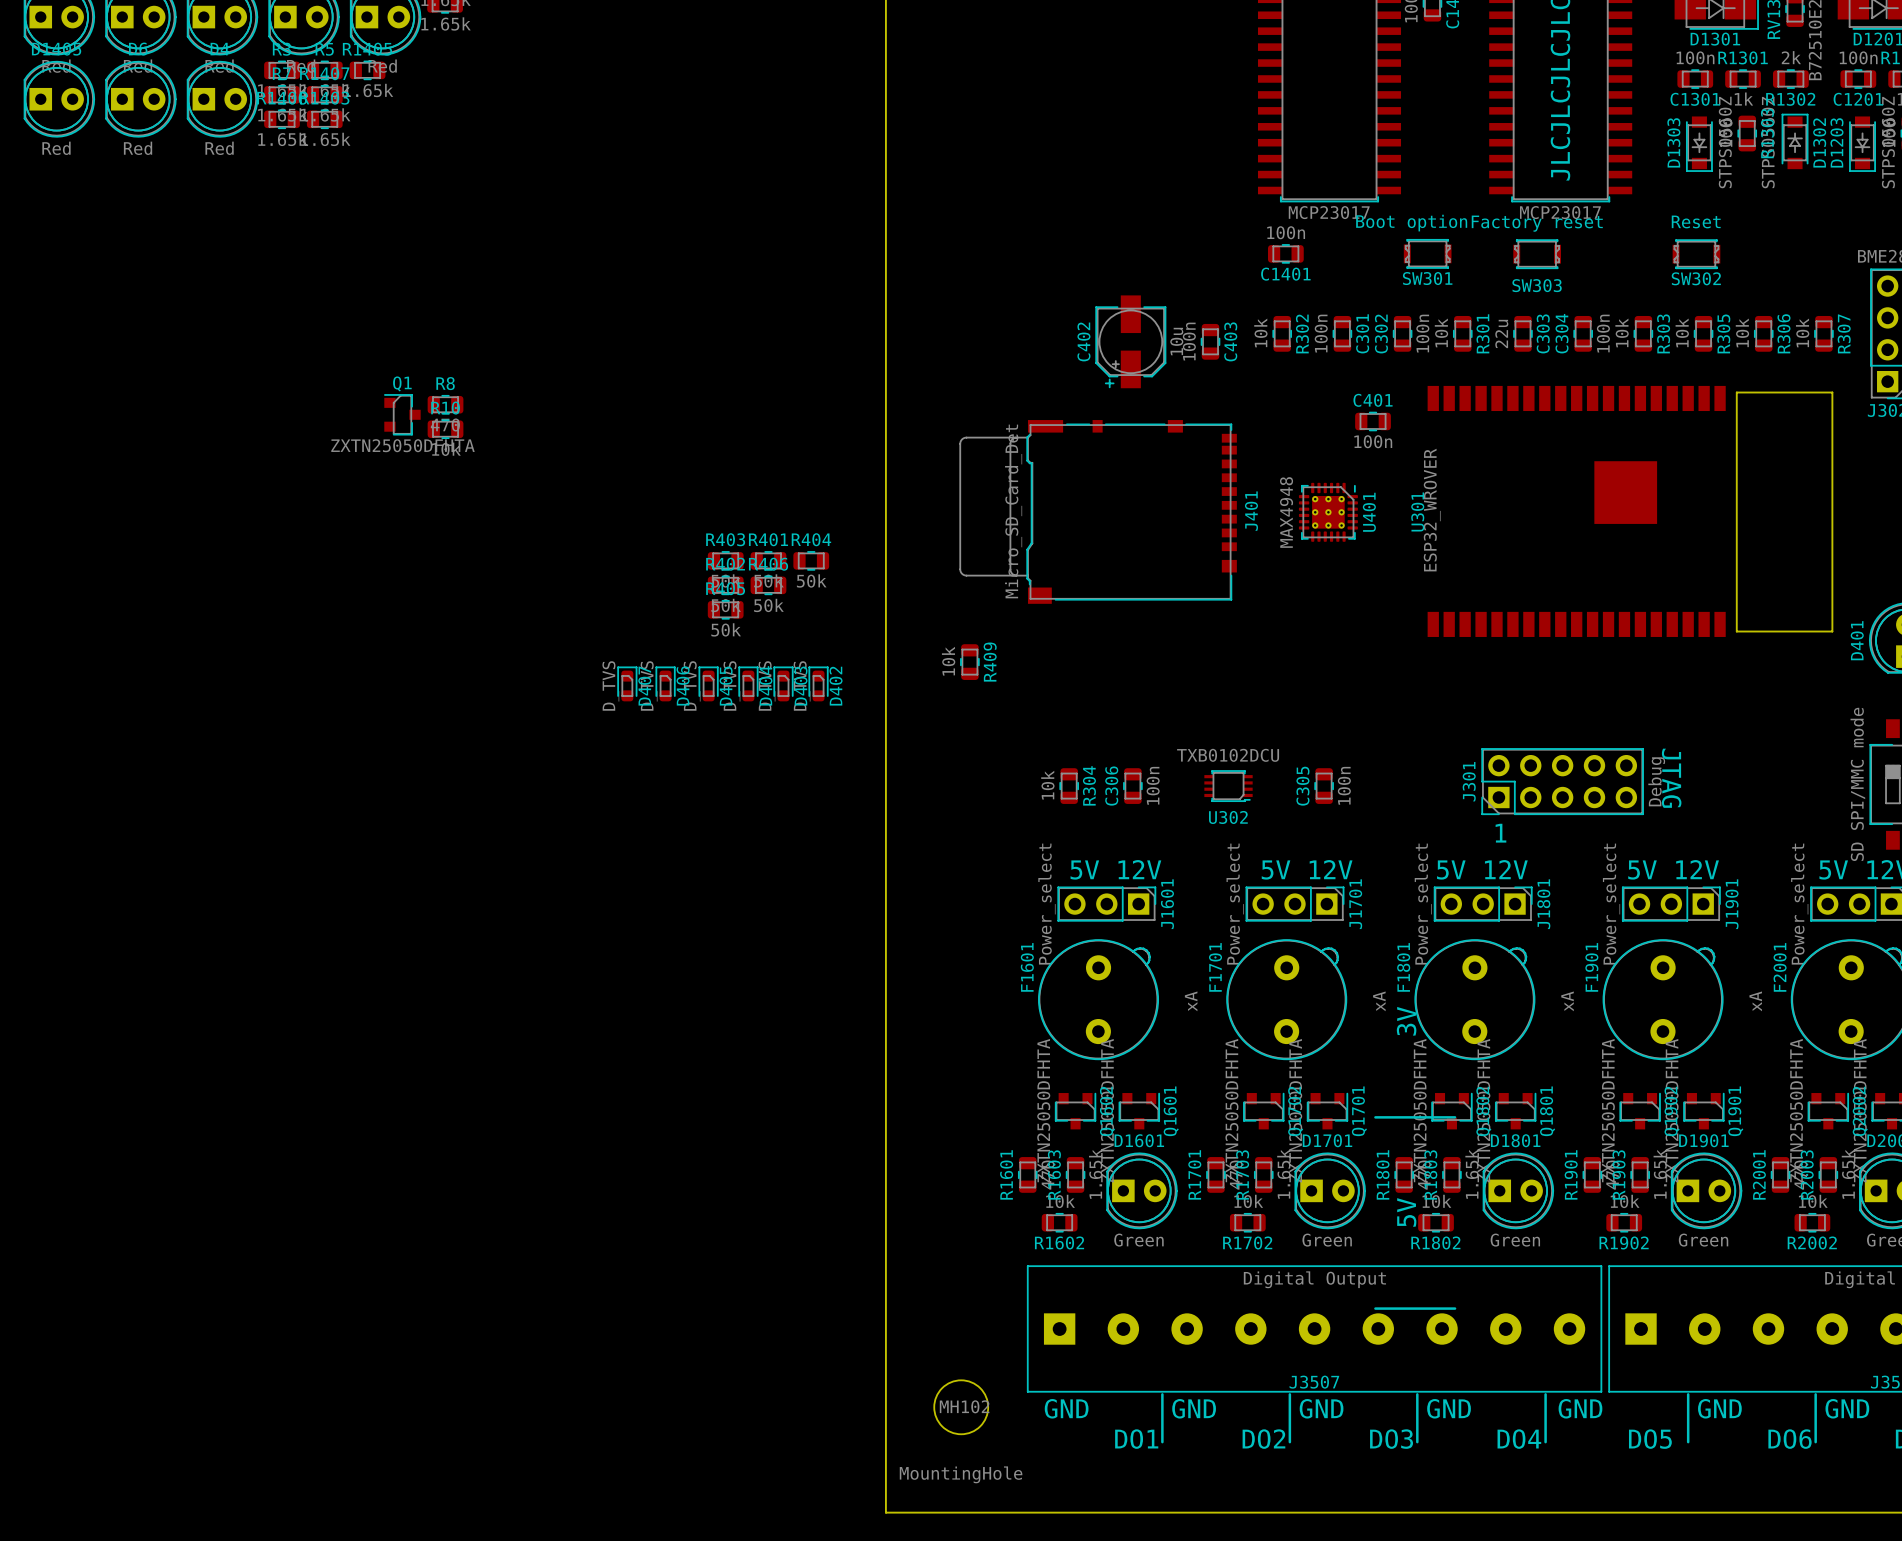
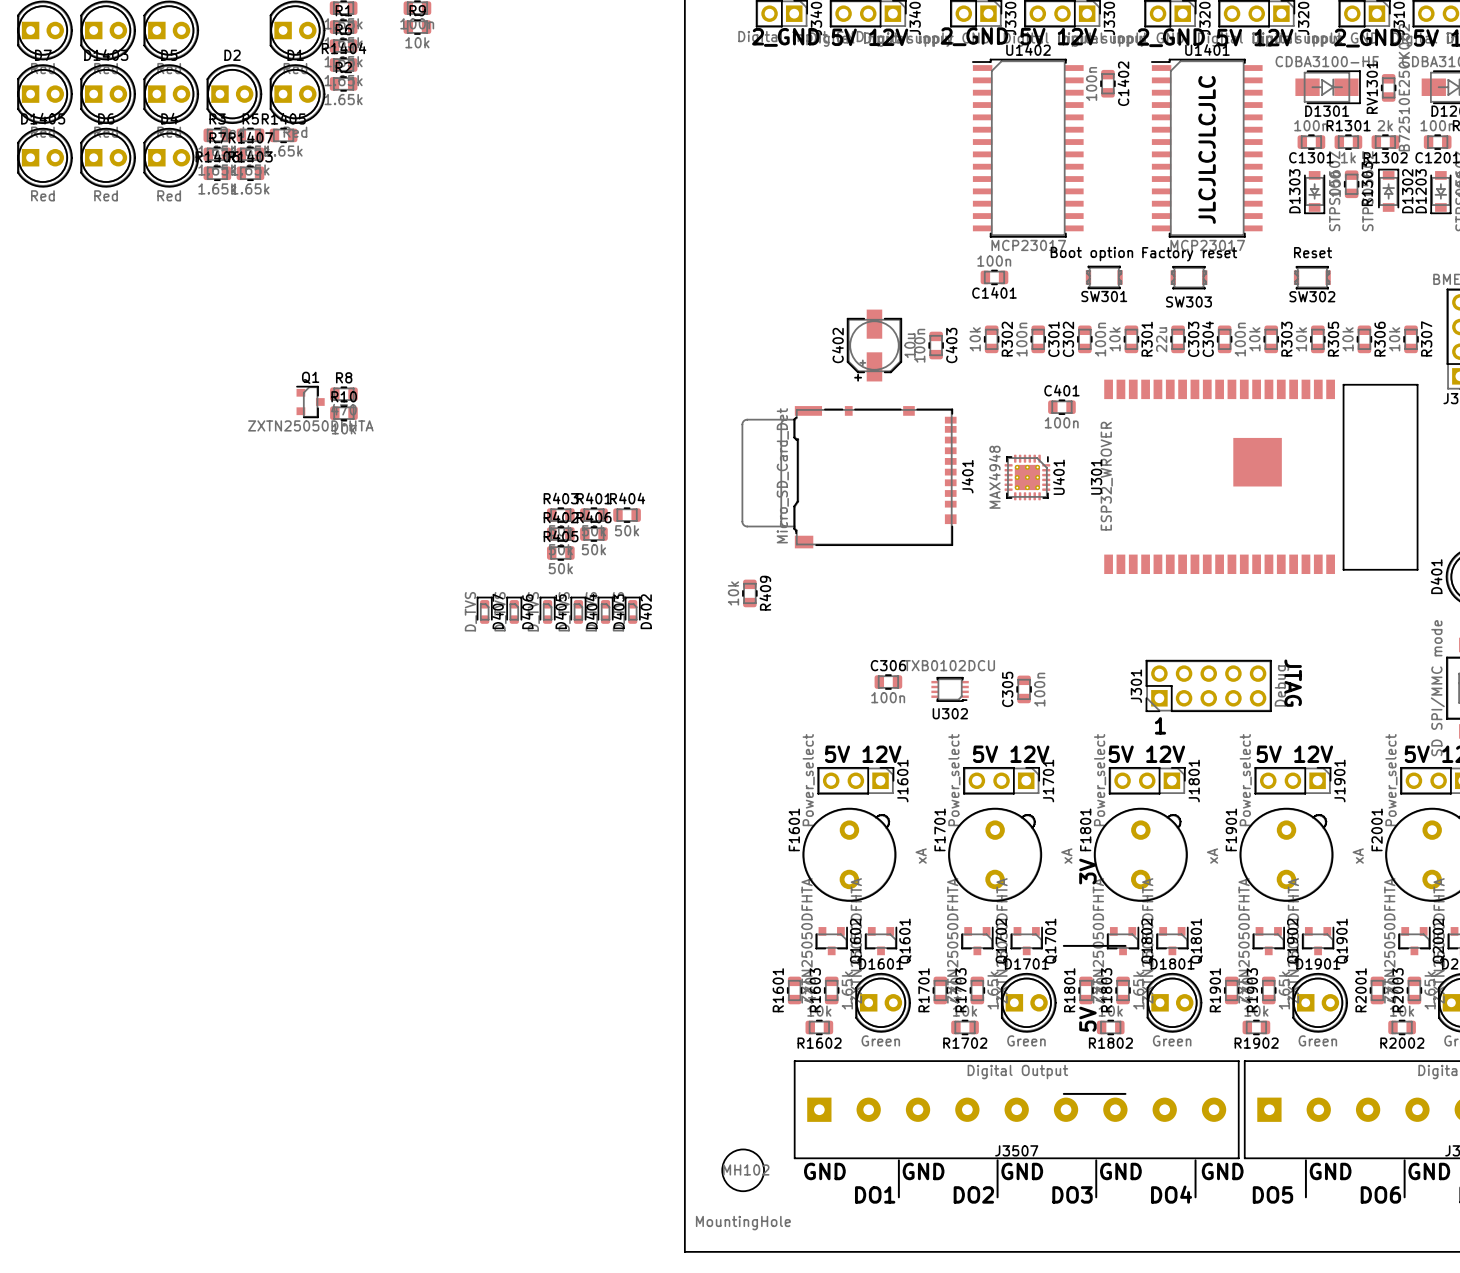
R304: 10k (1069, 786) -> none
C306 rotation: 0° (1132, 786) -> 90° clockwise (888, 682)

